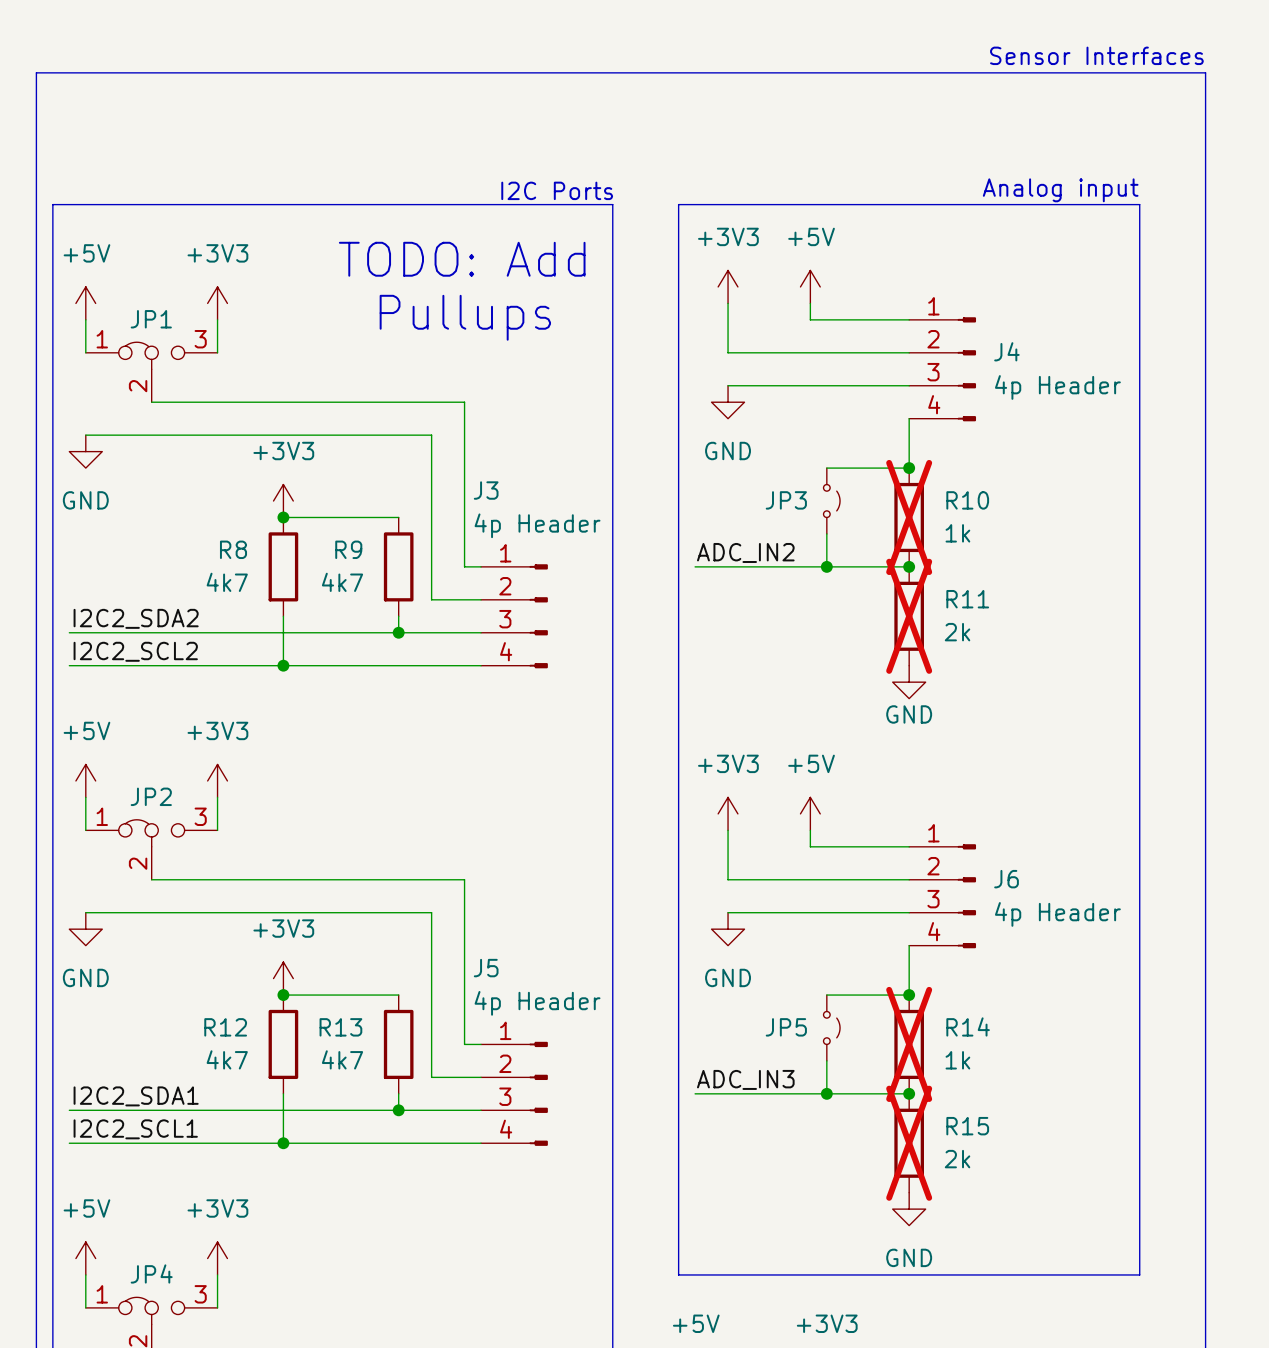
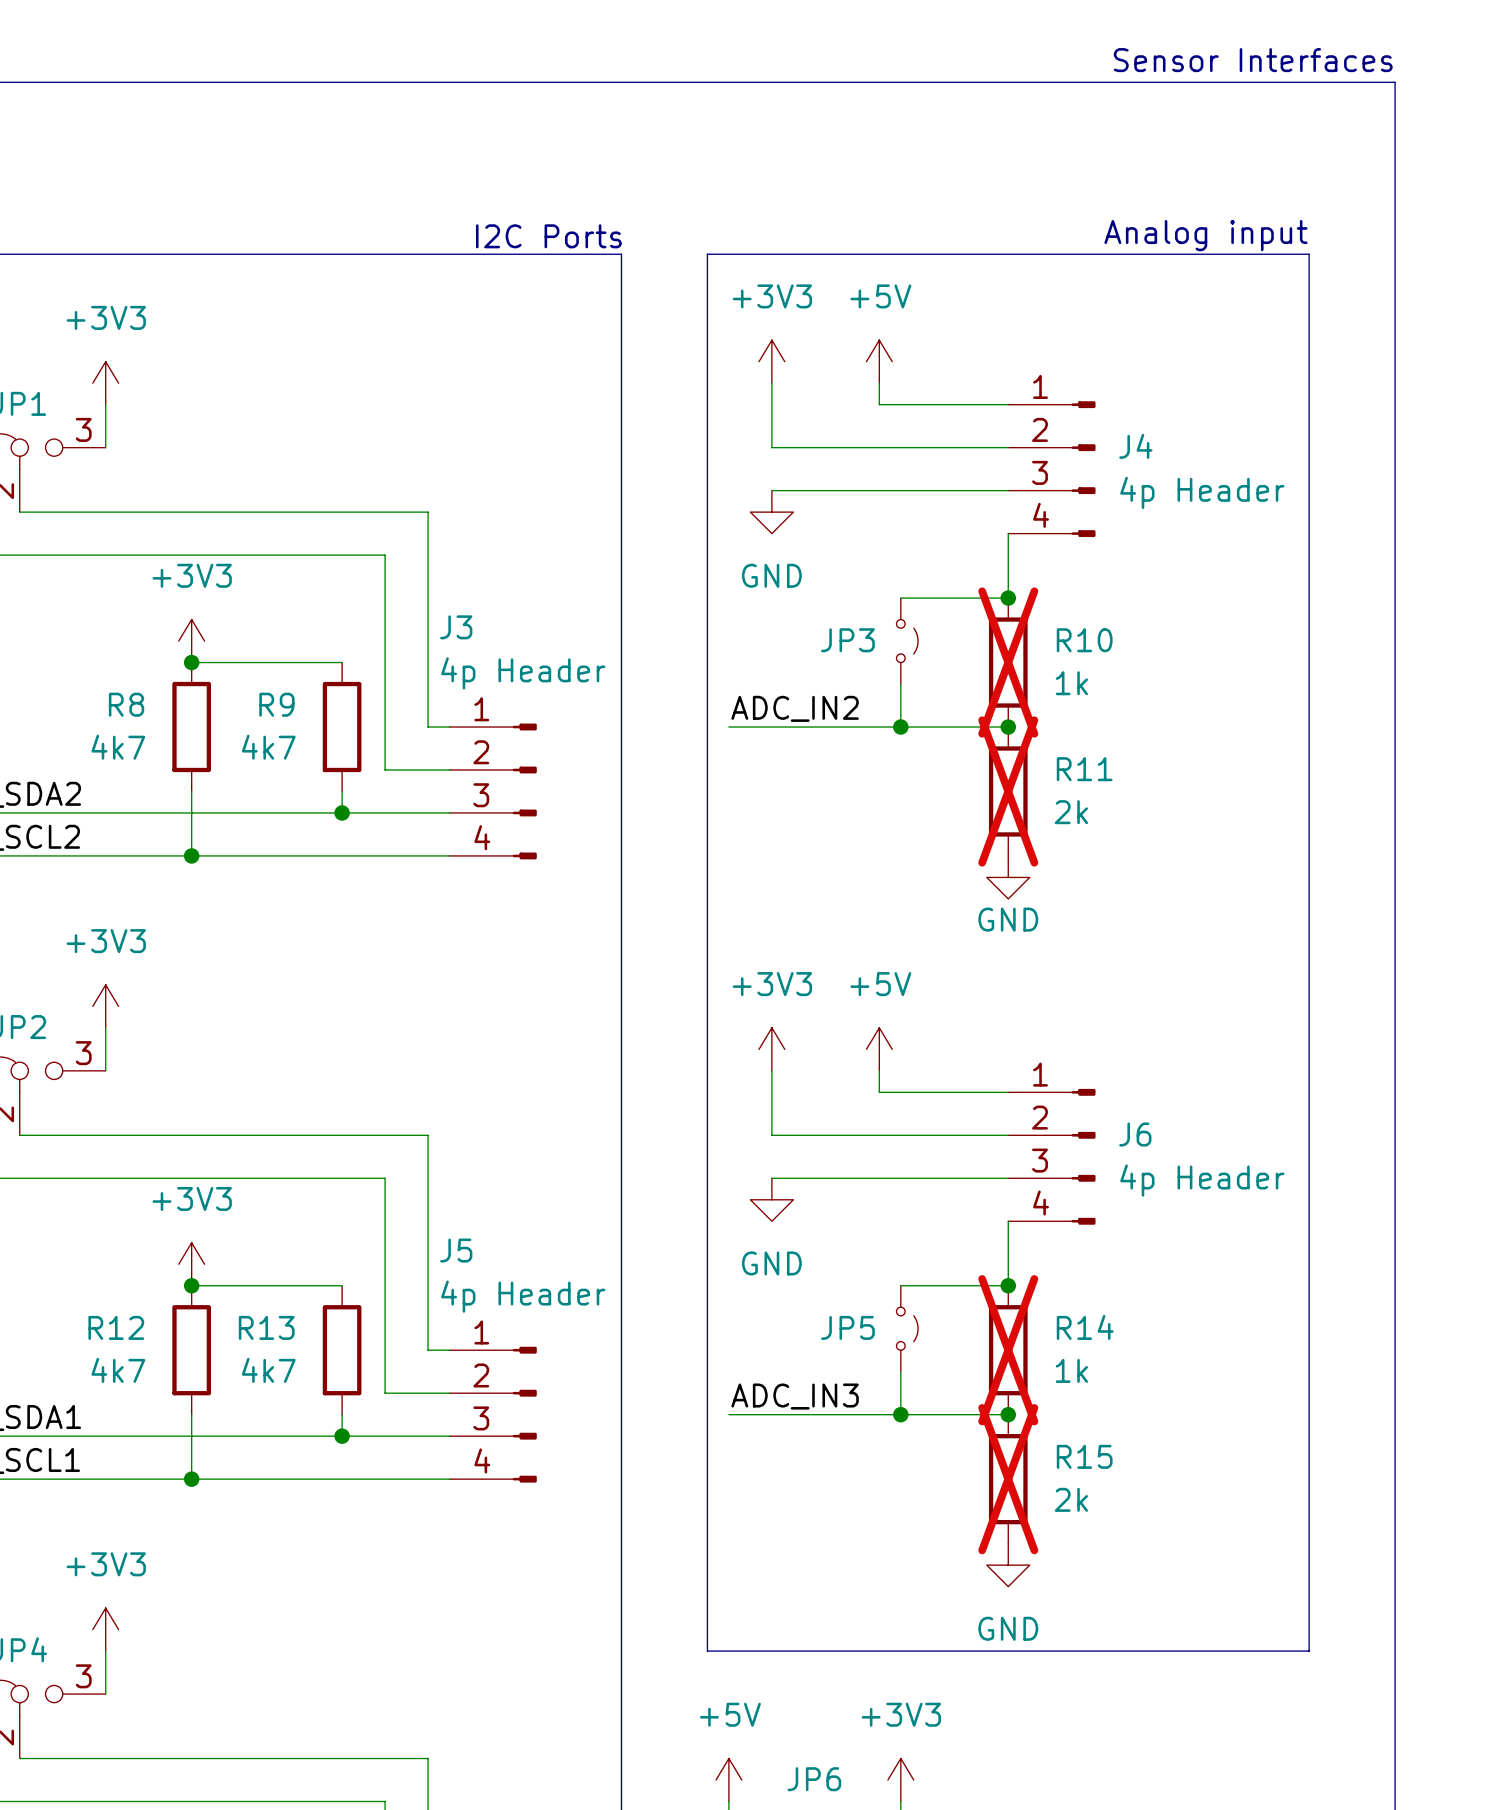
text: TODO: Add (462, 259) -> none
text: Pullups (465, 317) -> none

